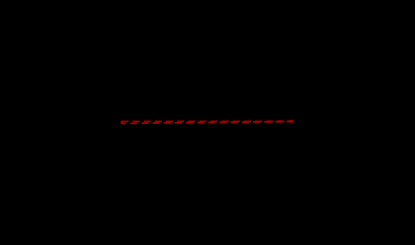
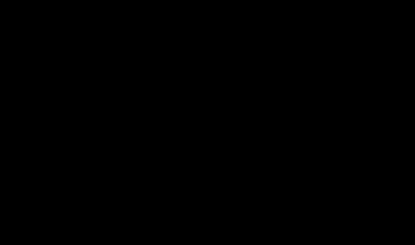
top zone outline: (121, 121) (293, 121) (121, 123) (121, 121) -> none

